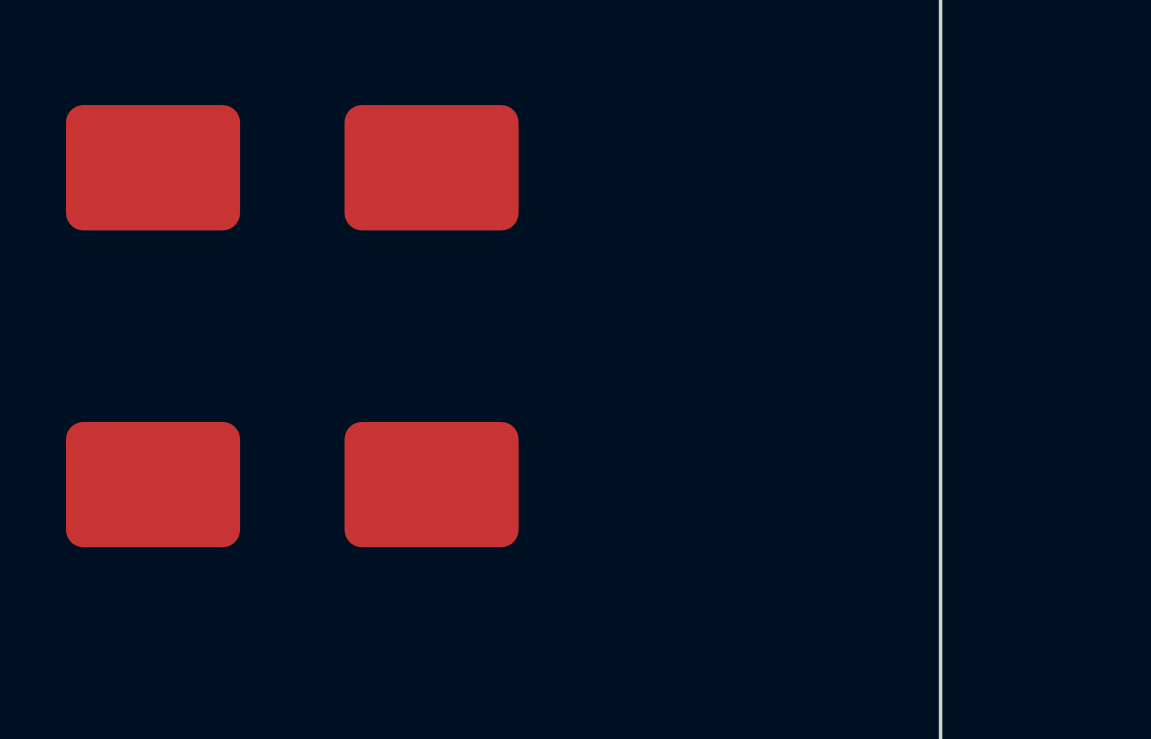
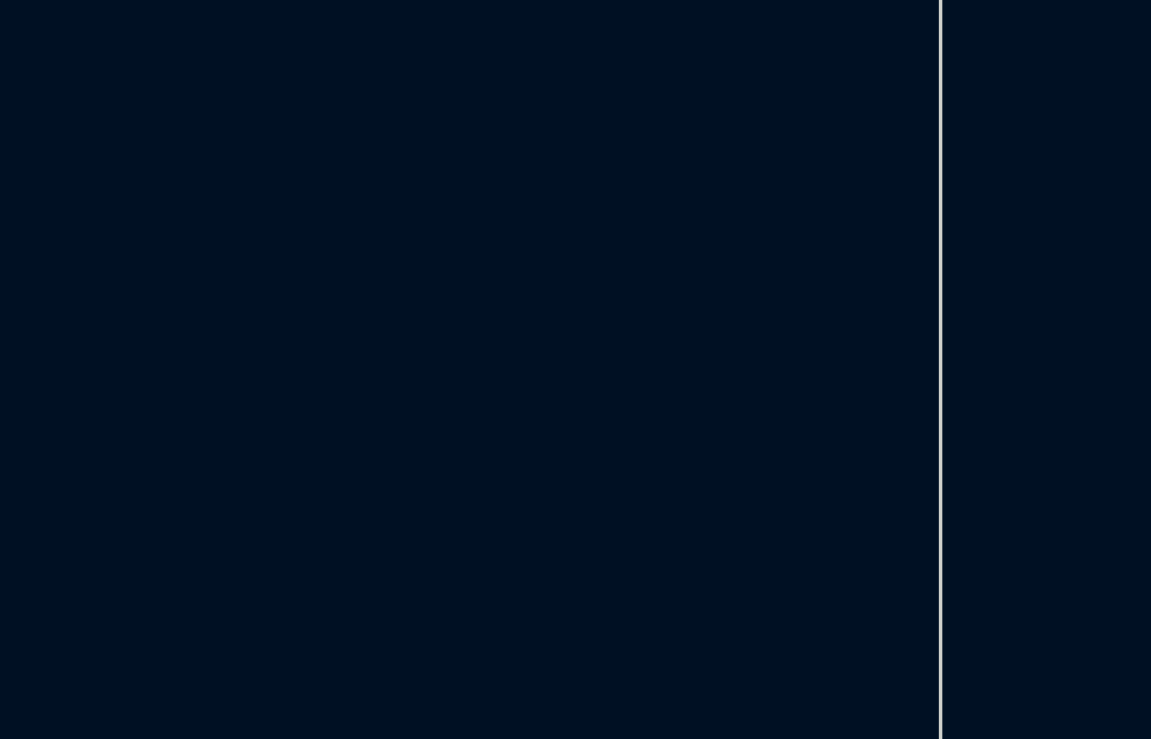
part: (292, 167) -> none
part: (292, 484) -> none

